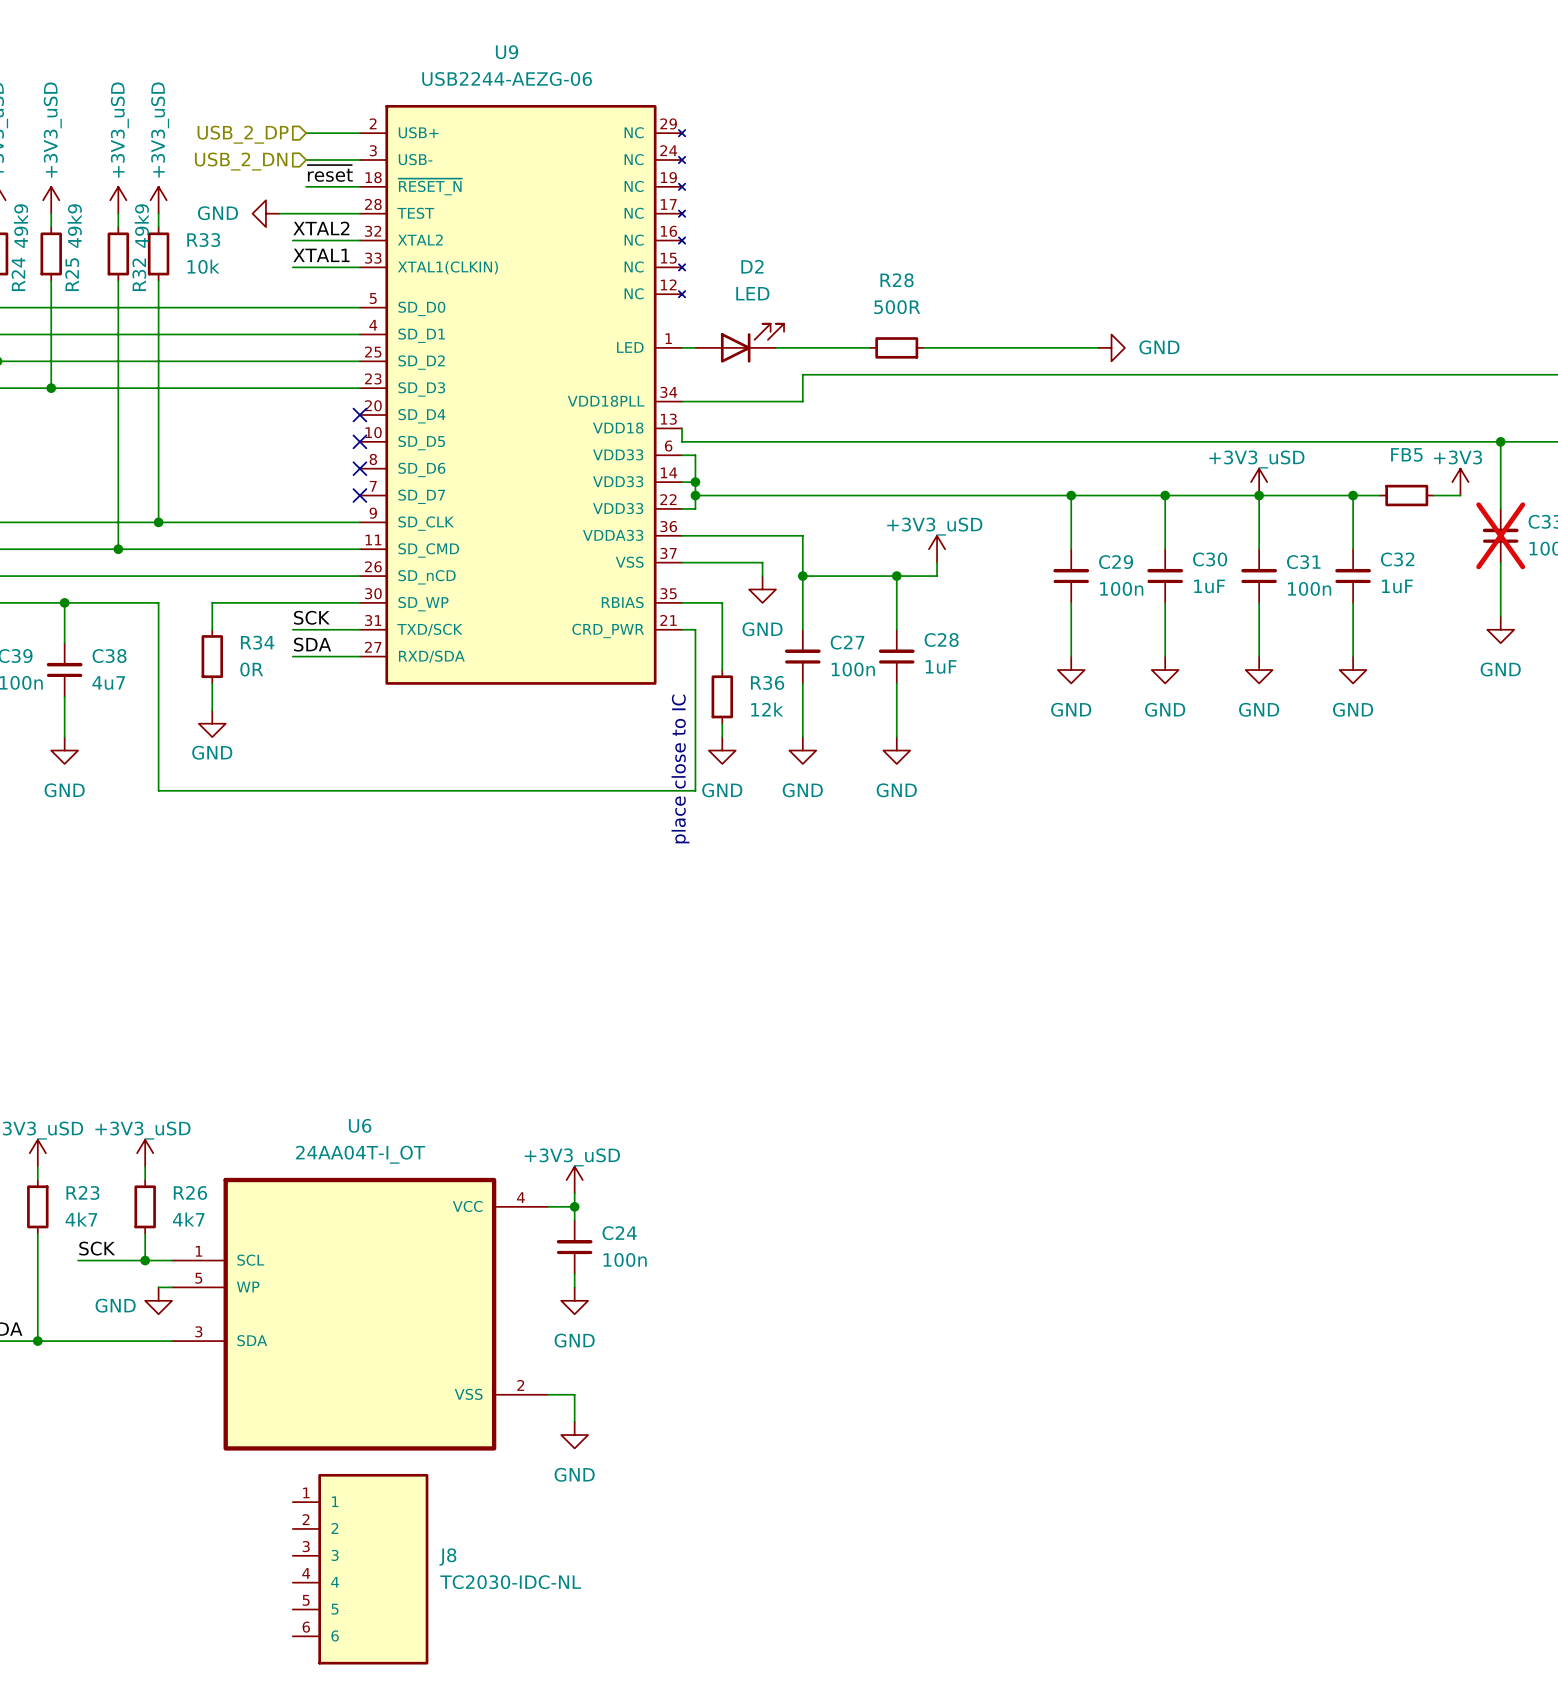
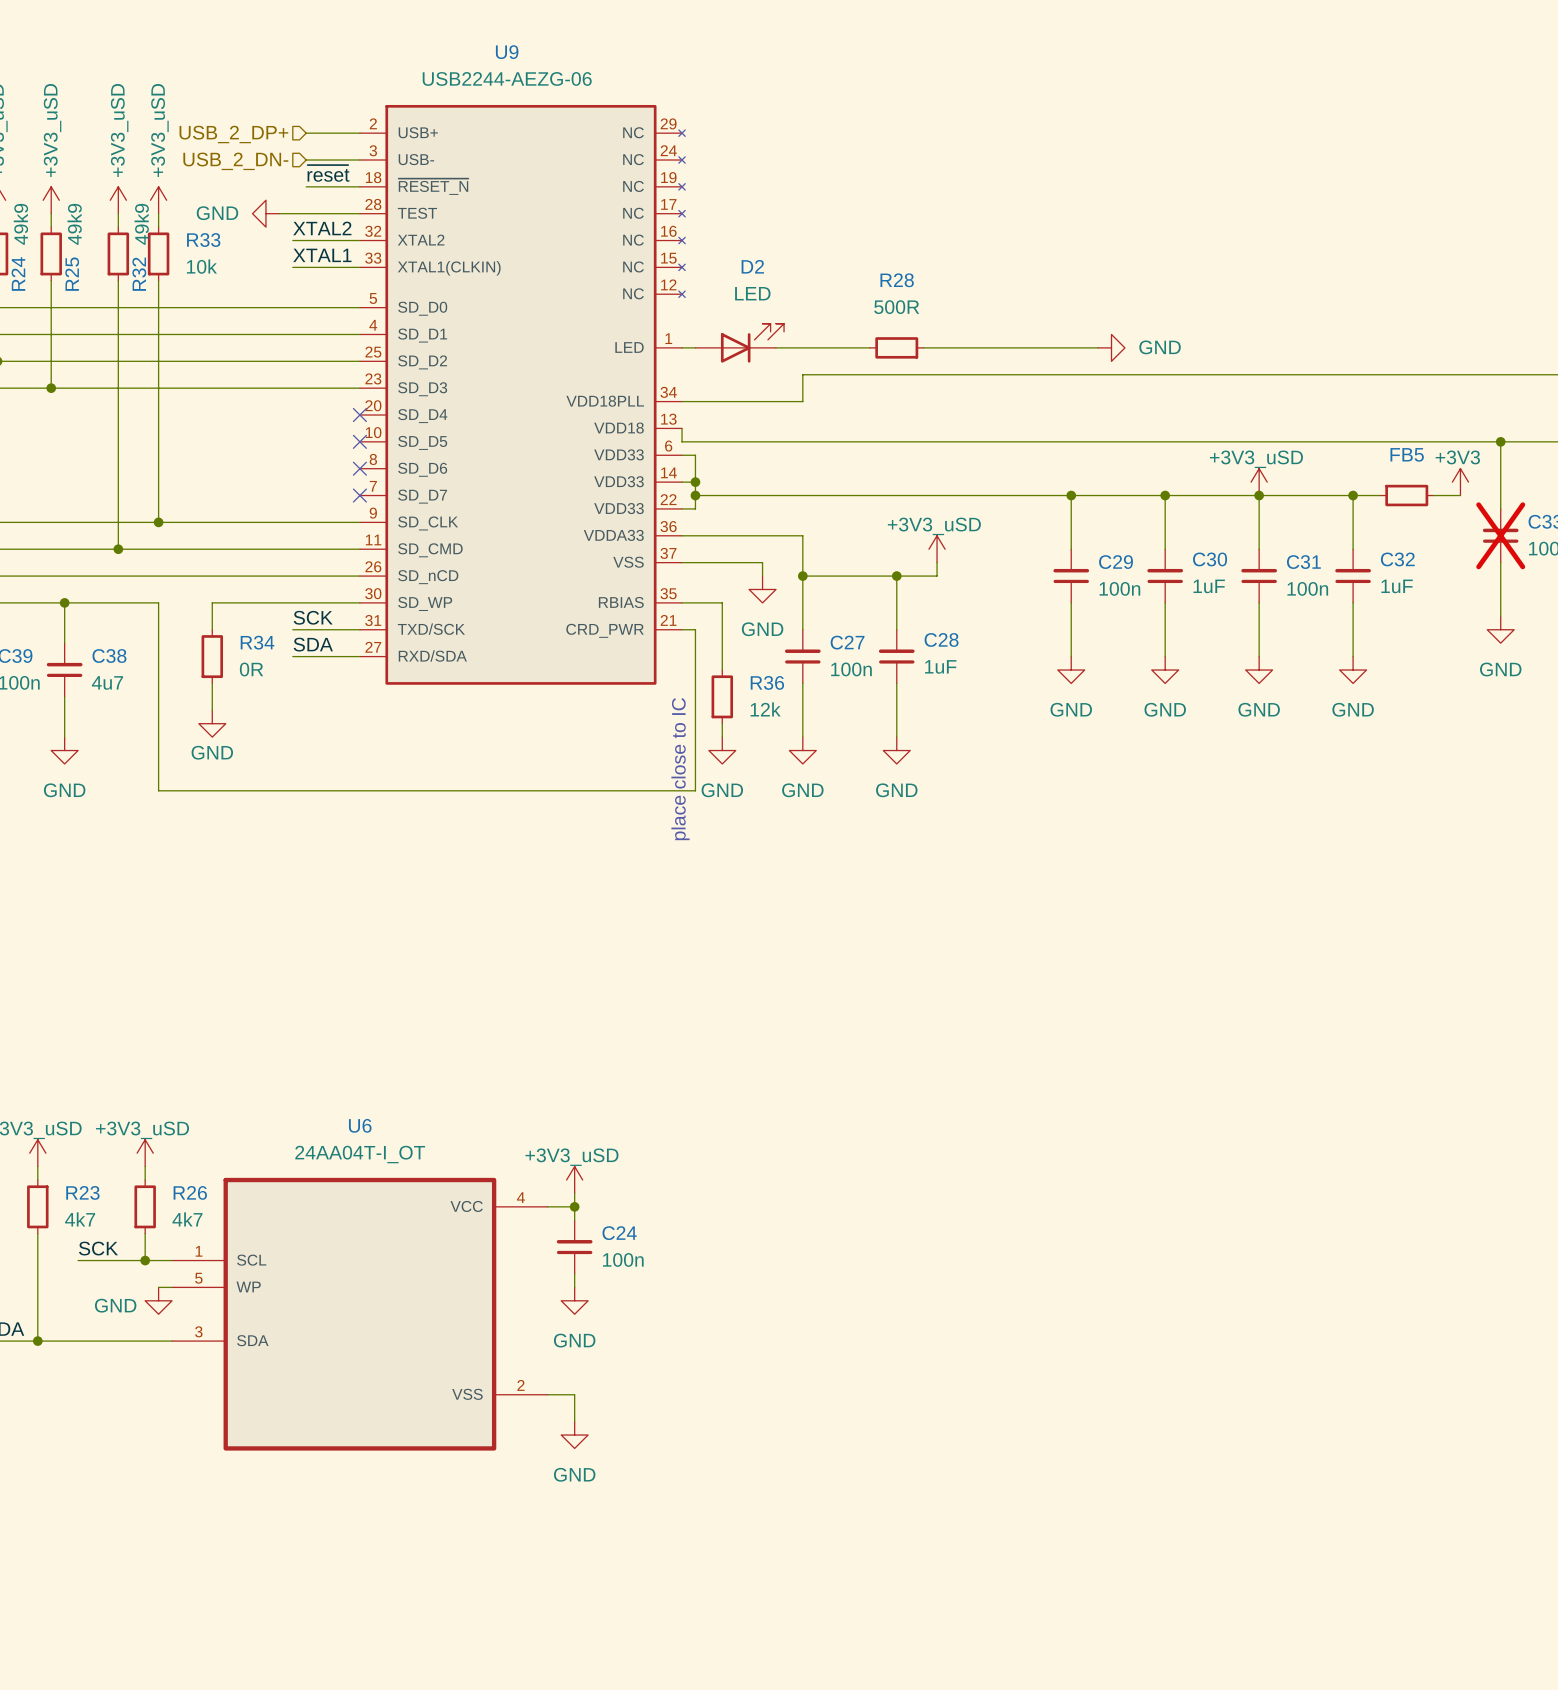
hierarchical label: USB_2_DP (243, 134) -> USB_2_DP+ (233, 134)
hierarchical label: USB_2_DN (241, 161) -> USB_2_DN- (235, 161)
J8: TC2030-IDC-NL (360, 1569) -> none

